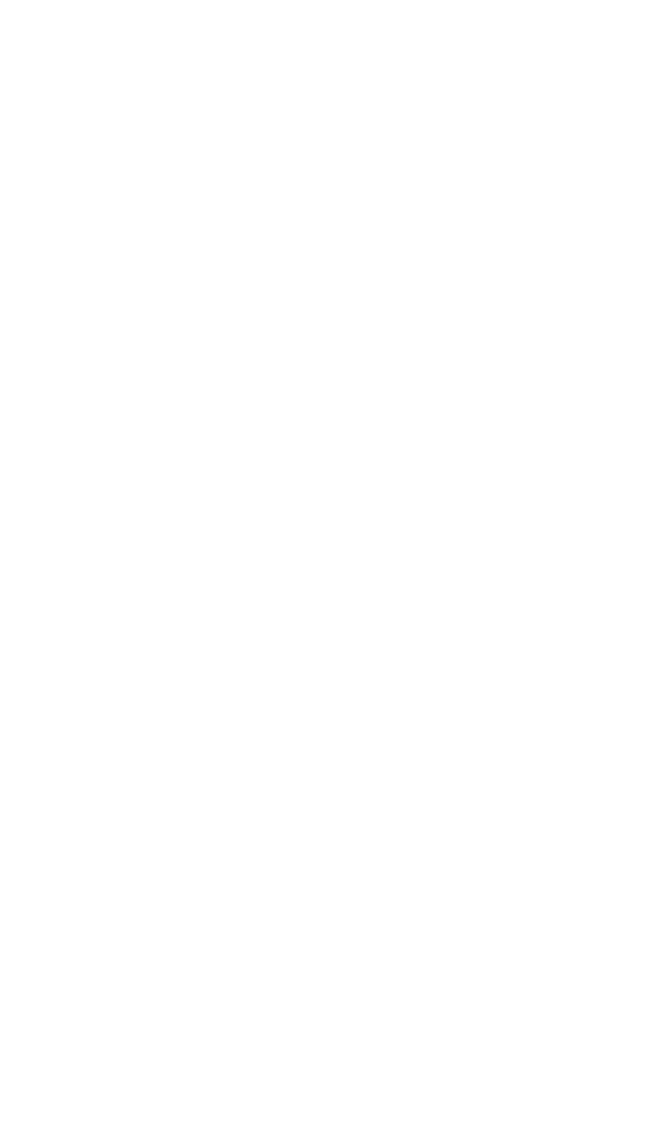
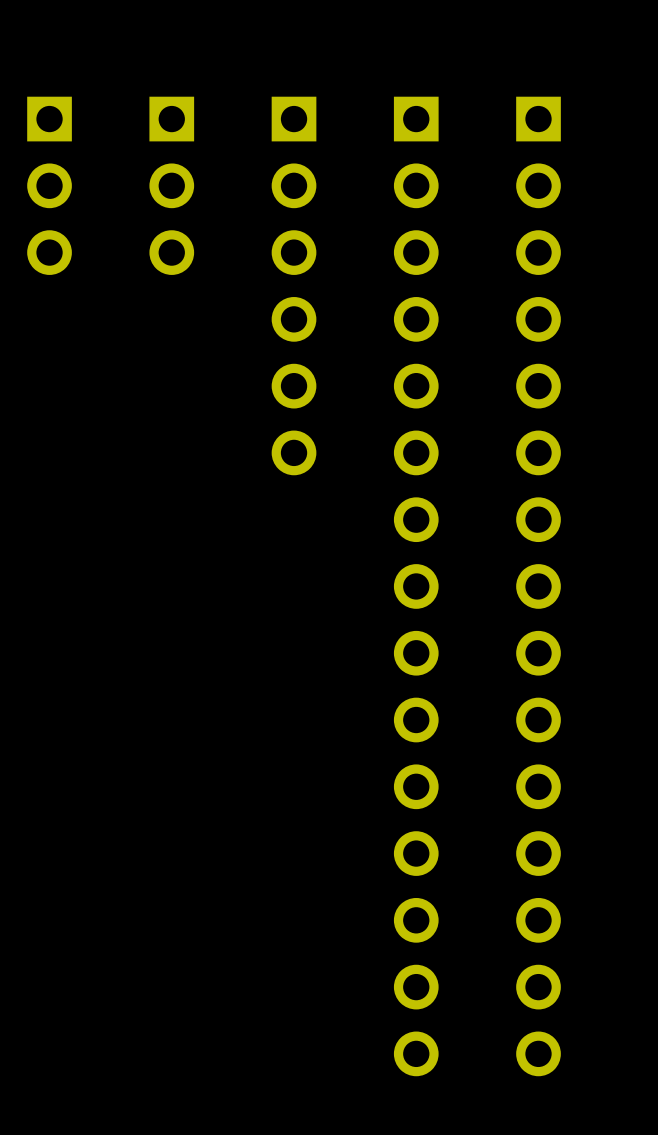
part: none -> (49, 185)
part: none -> (171, 185)
part: none -> (294, 285)
part: none -> (416, 586)
part: none -> (538, 586)

